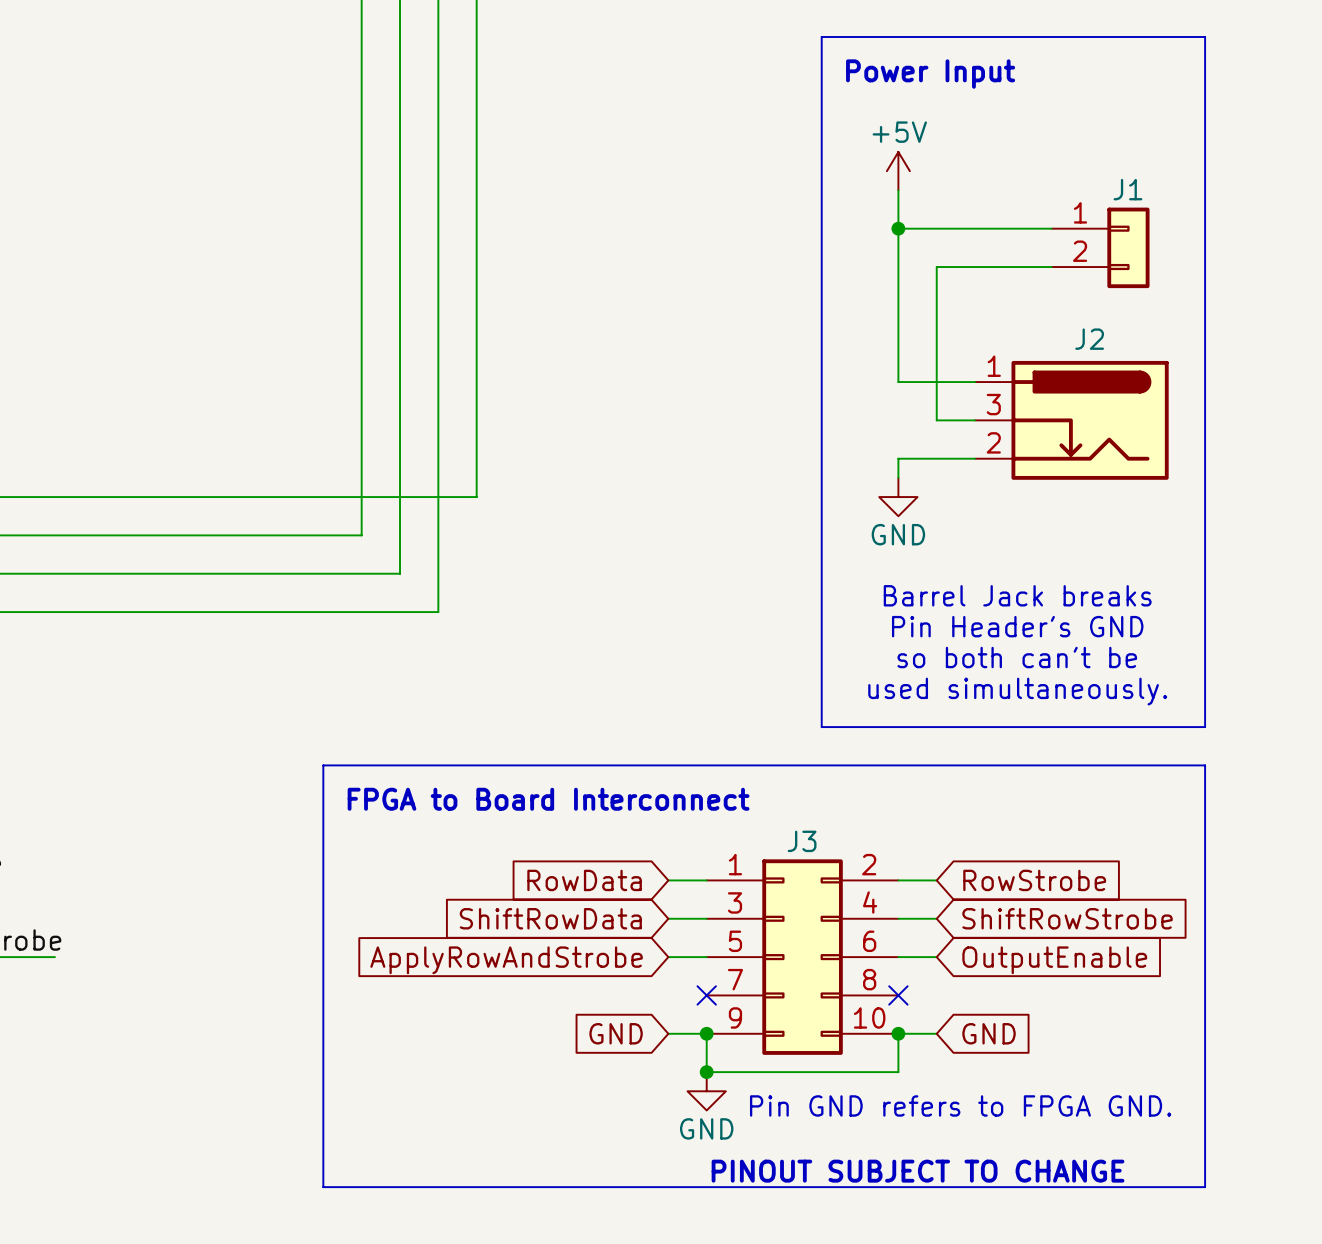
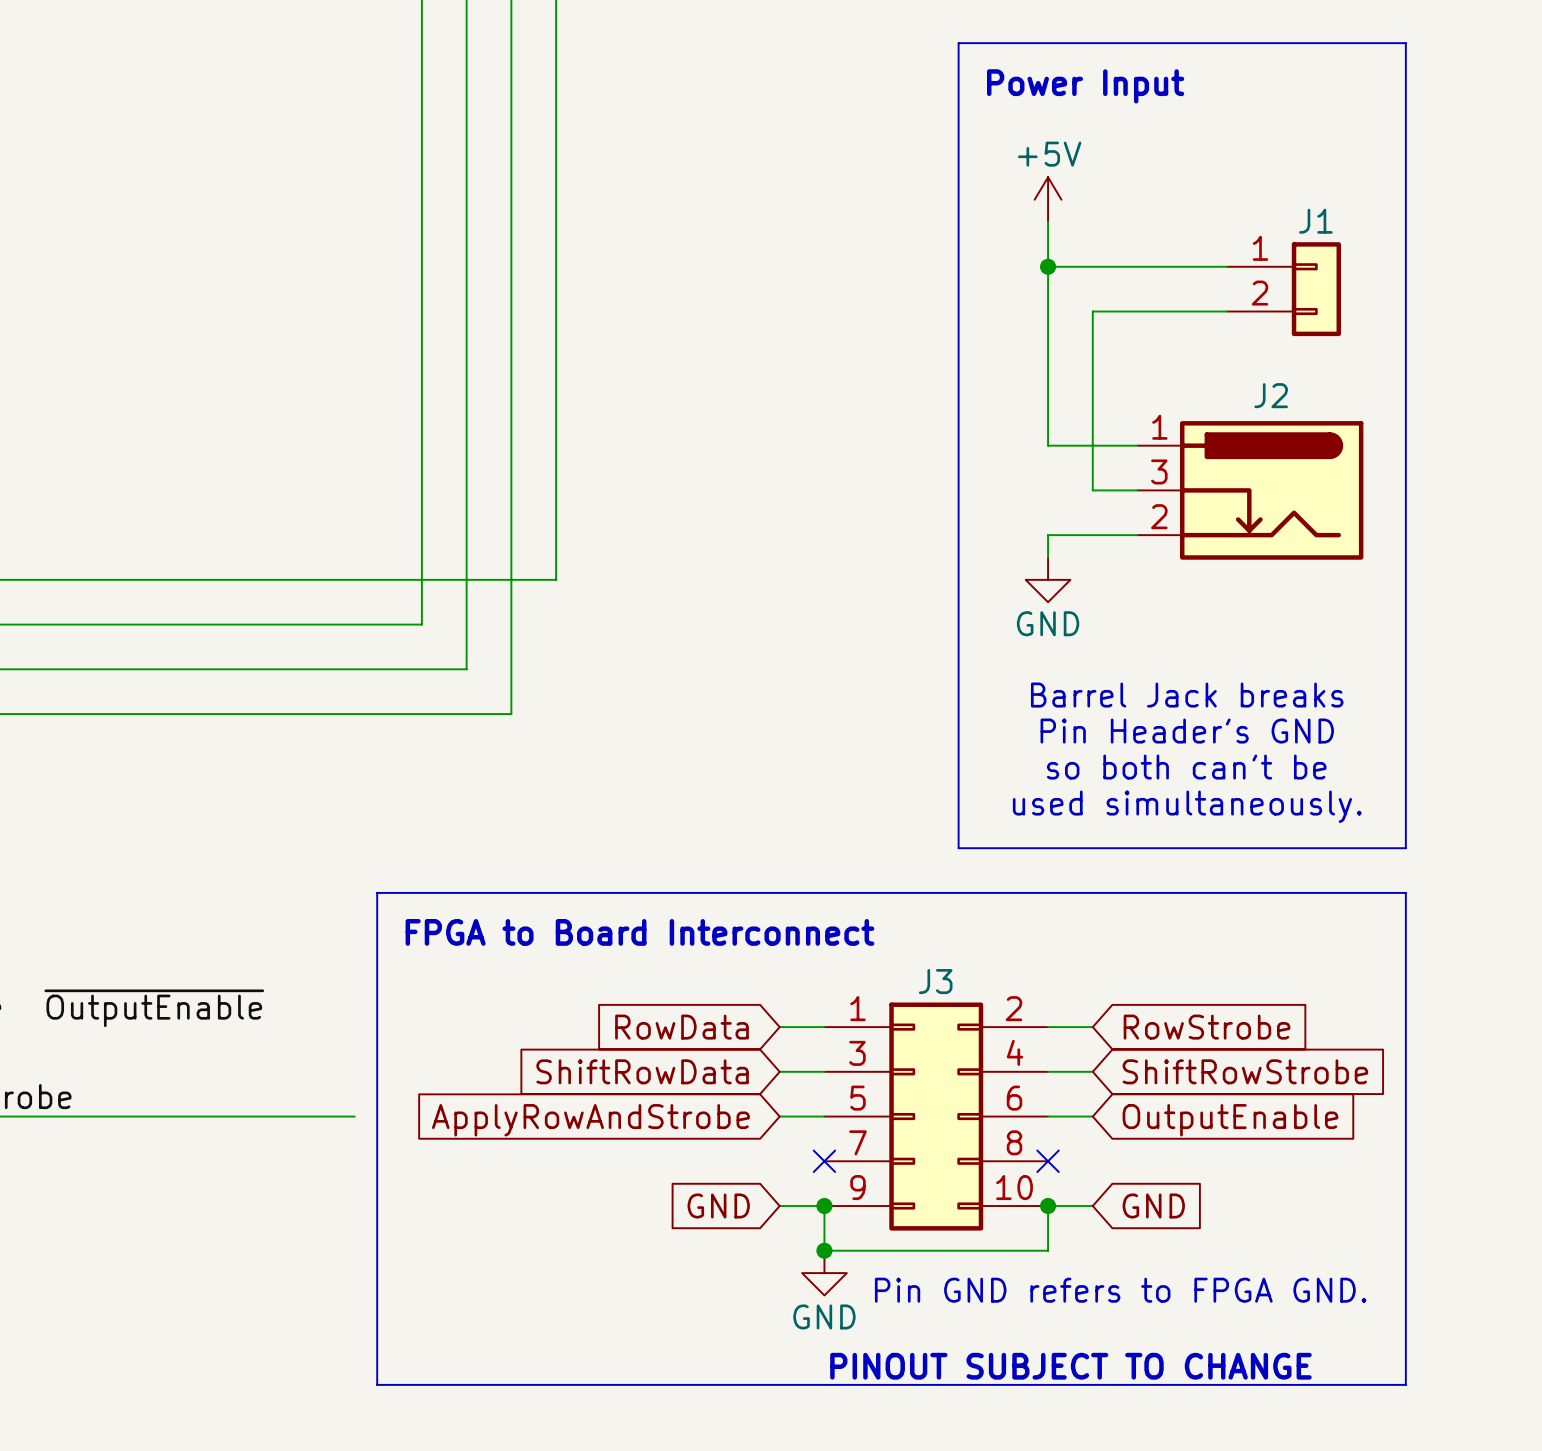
label: none -> ~{OutputEnable} (154, 1008)
wire: none -> (64, 1116) (354, 1116)

